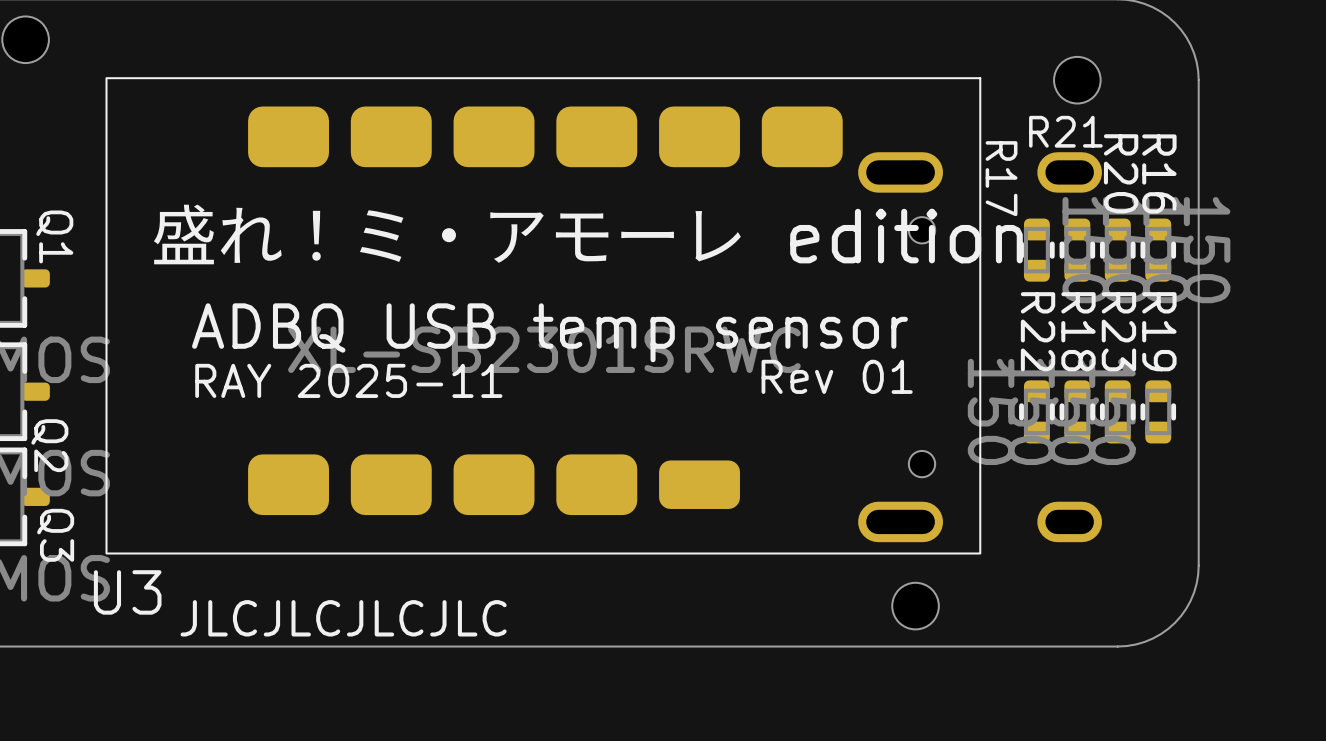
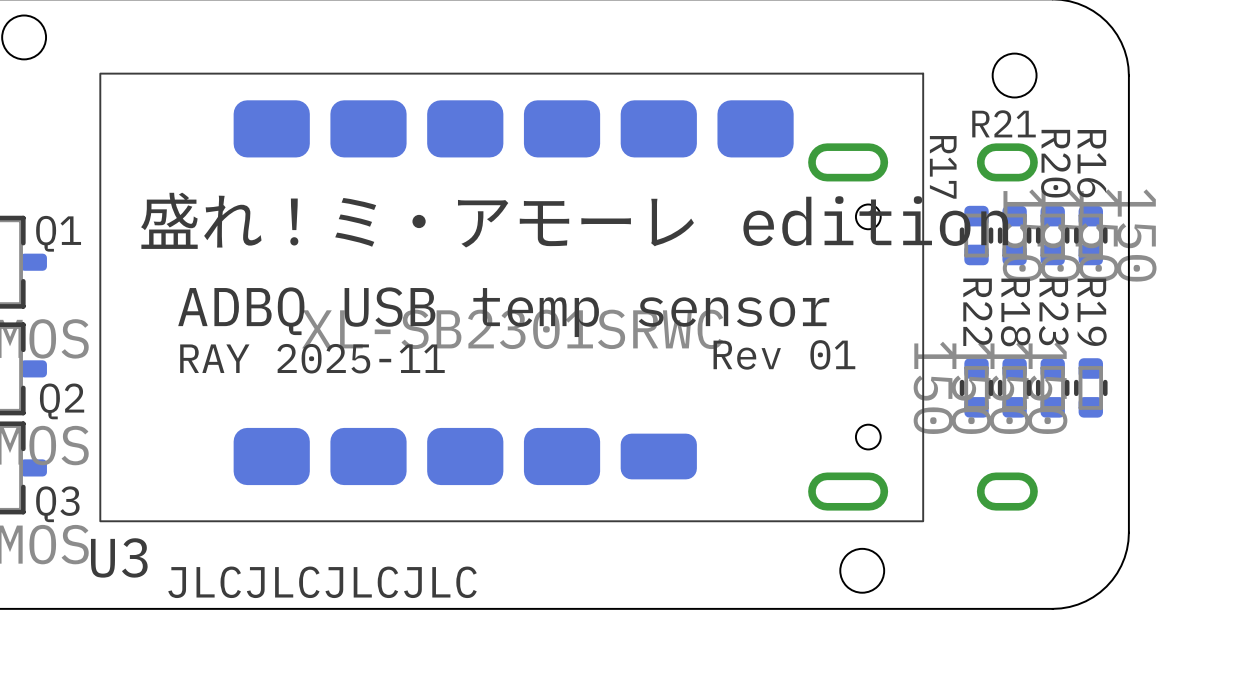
Q1 name rotation: 0° (54, 236) -> 90° counterclockwise (58, 233)
Q2 name rotation: 0° (49, 445) -> 90° counterclockwise (62, 401)
Q3 name rotation: 0° (55, 535) -> 90° counterclockwise (57, 504)

